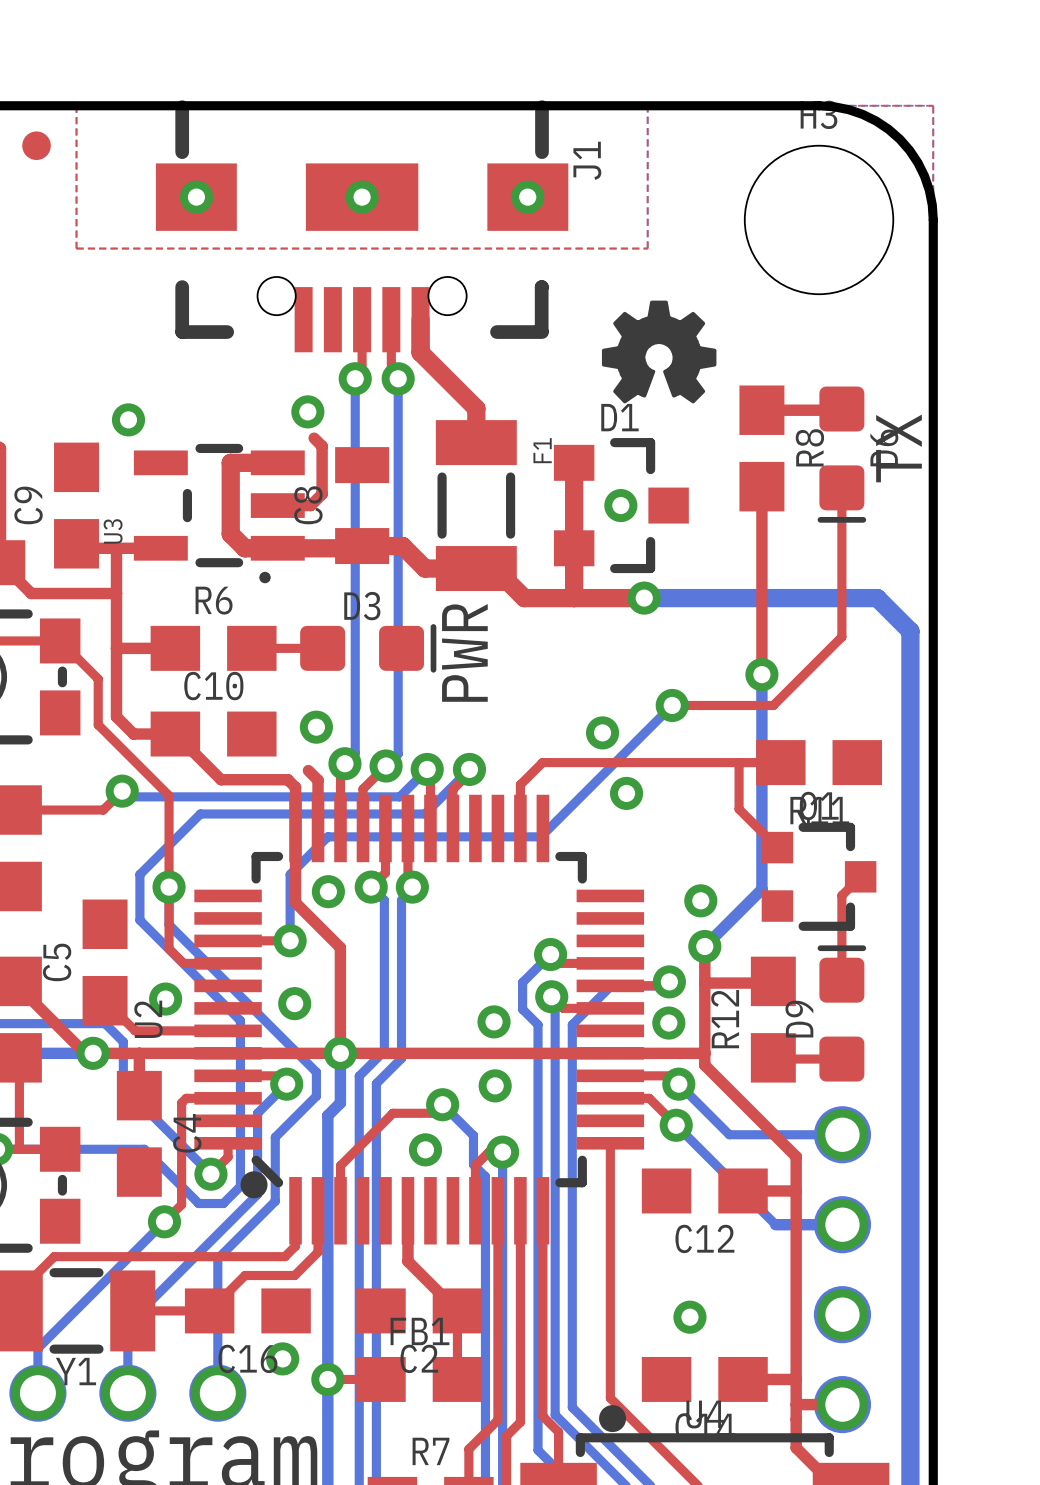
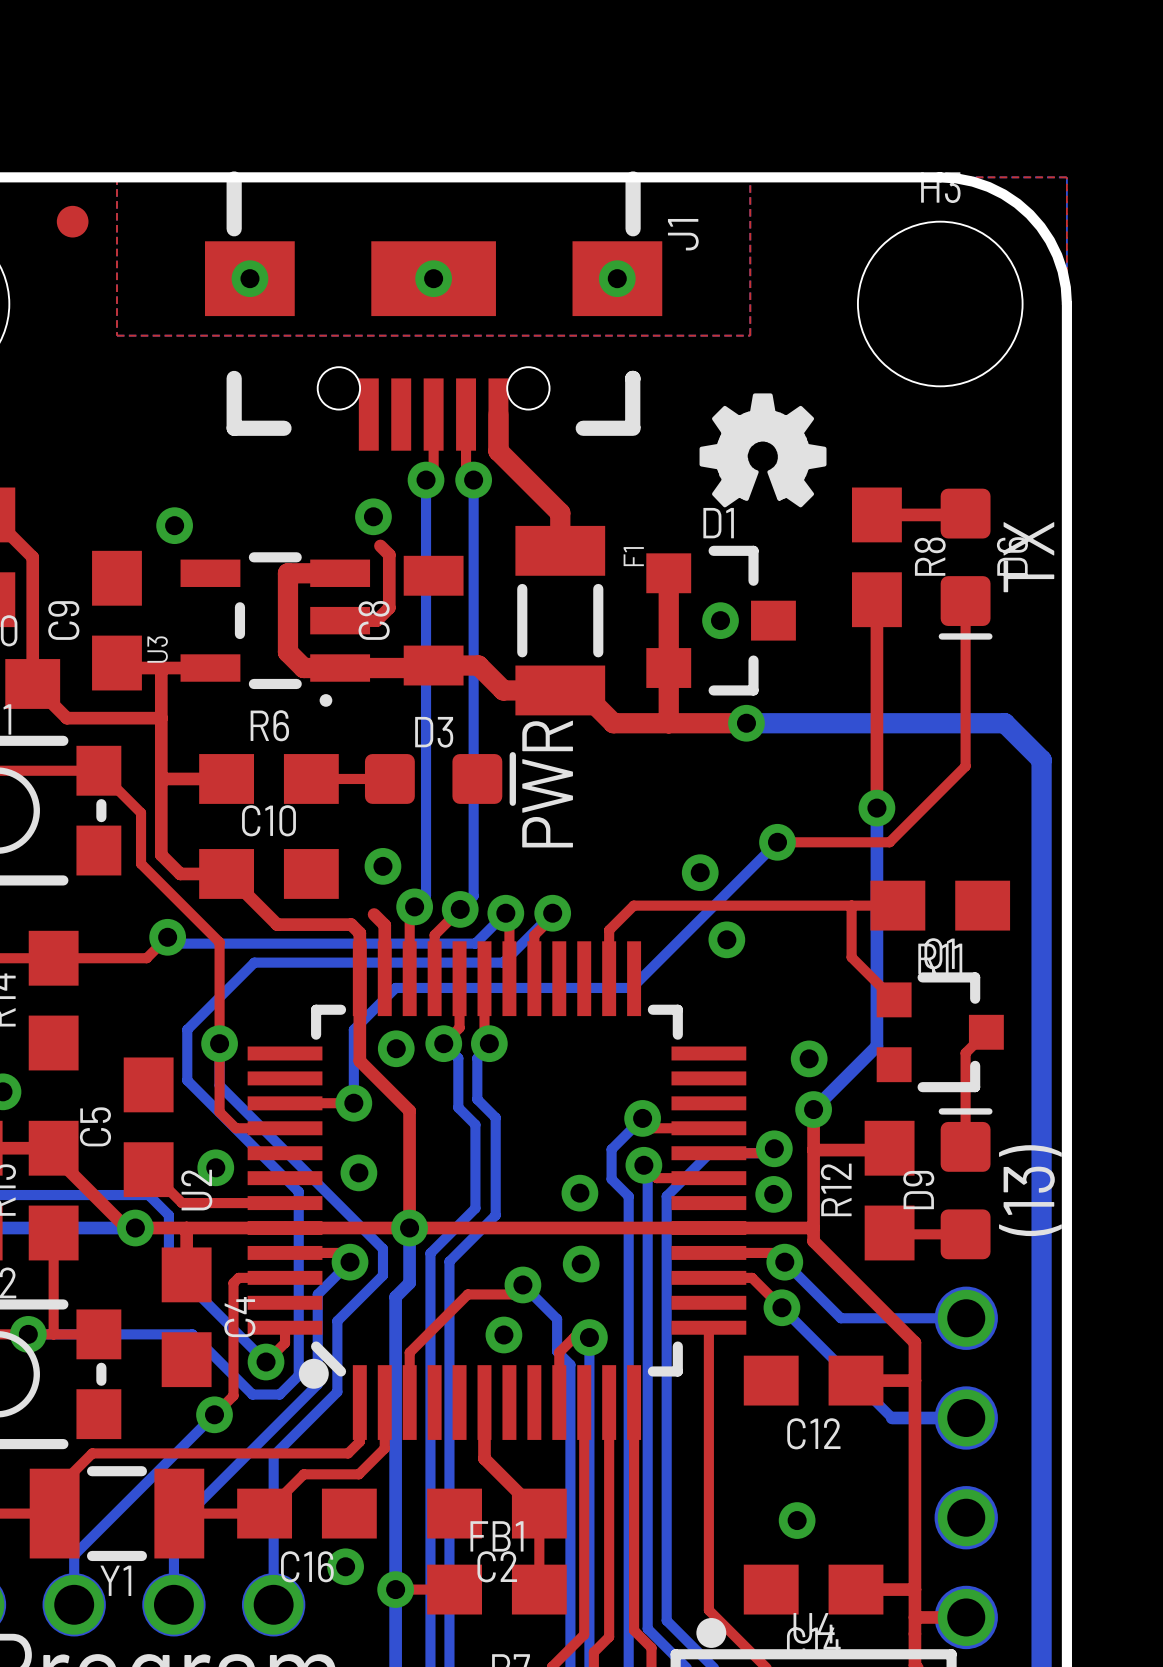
bottom track: (401, 937) (401, 1058) -> (477, 1099) (495, 1117) (495, 1215) (477, 1233)
bottom track: (384, 944) (384, 1051) -> (458, 1107) (475, 1124) (475, 1208) (458, 1225)
text: none -> (13) (1030, 1190)

